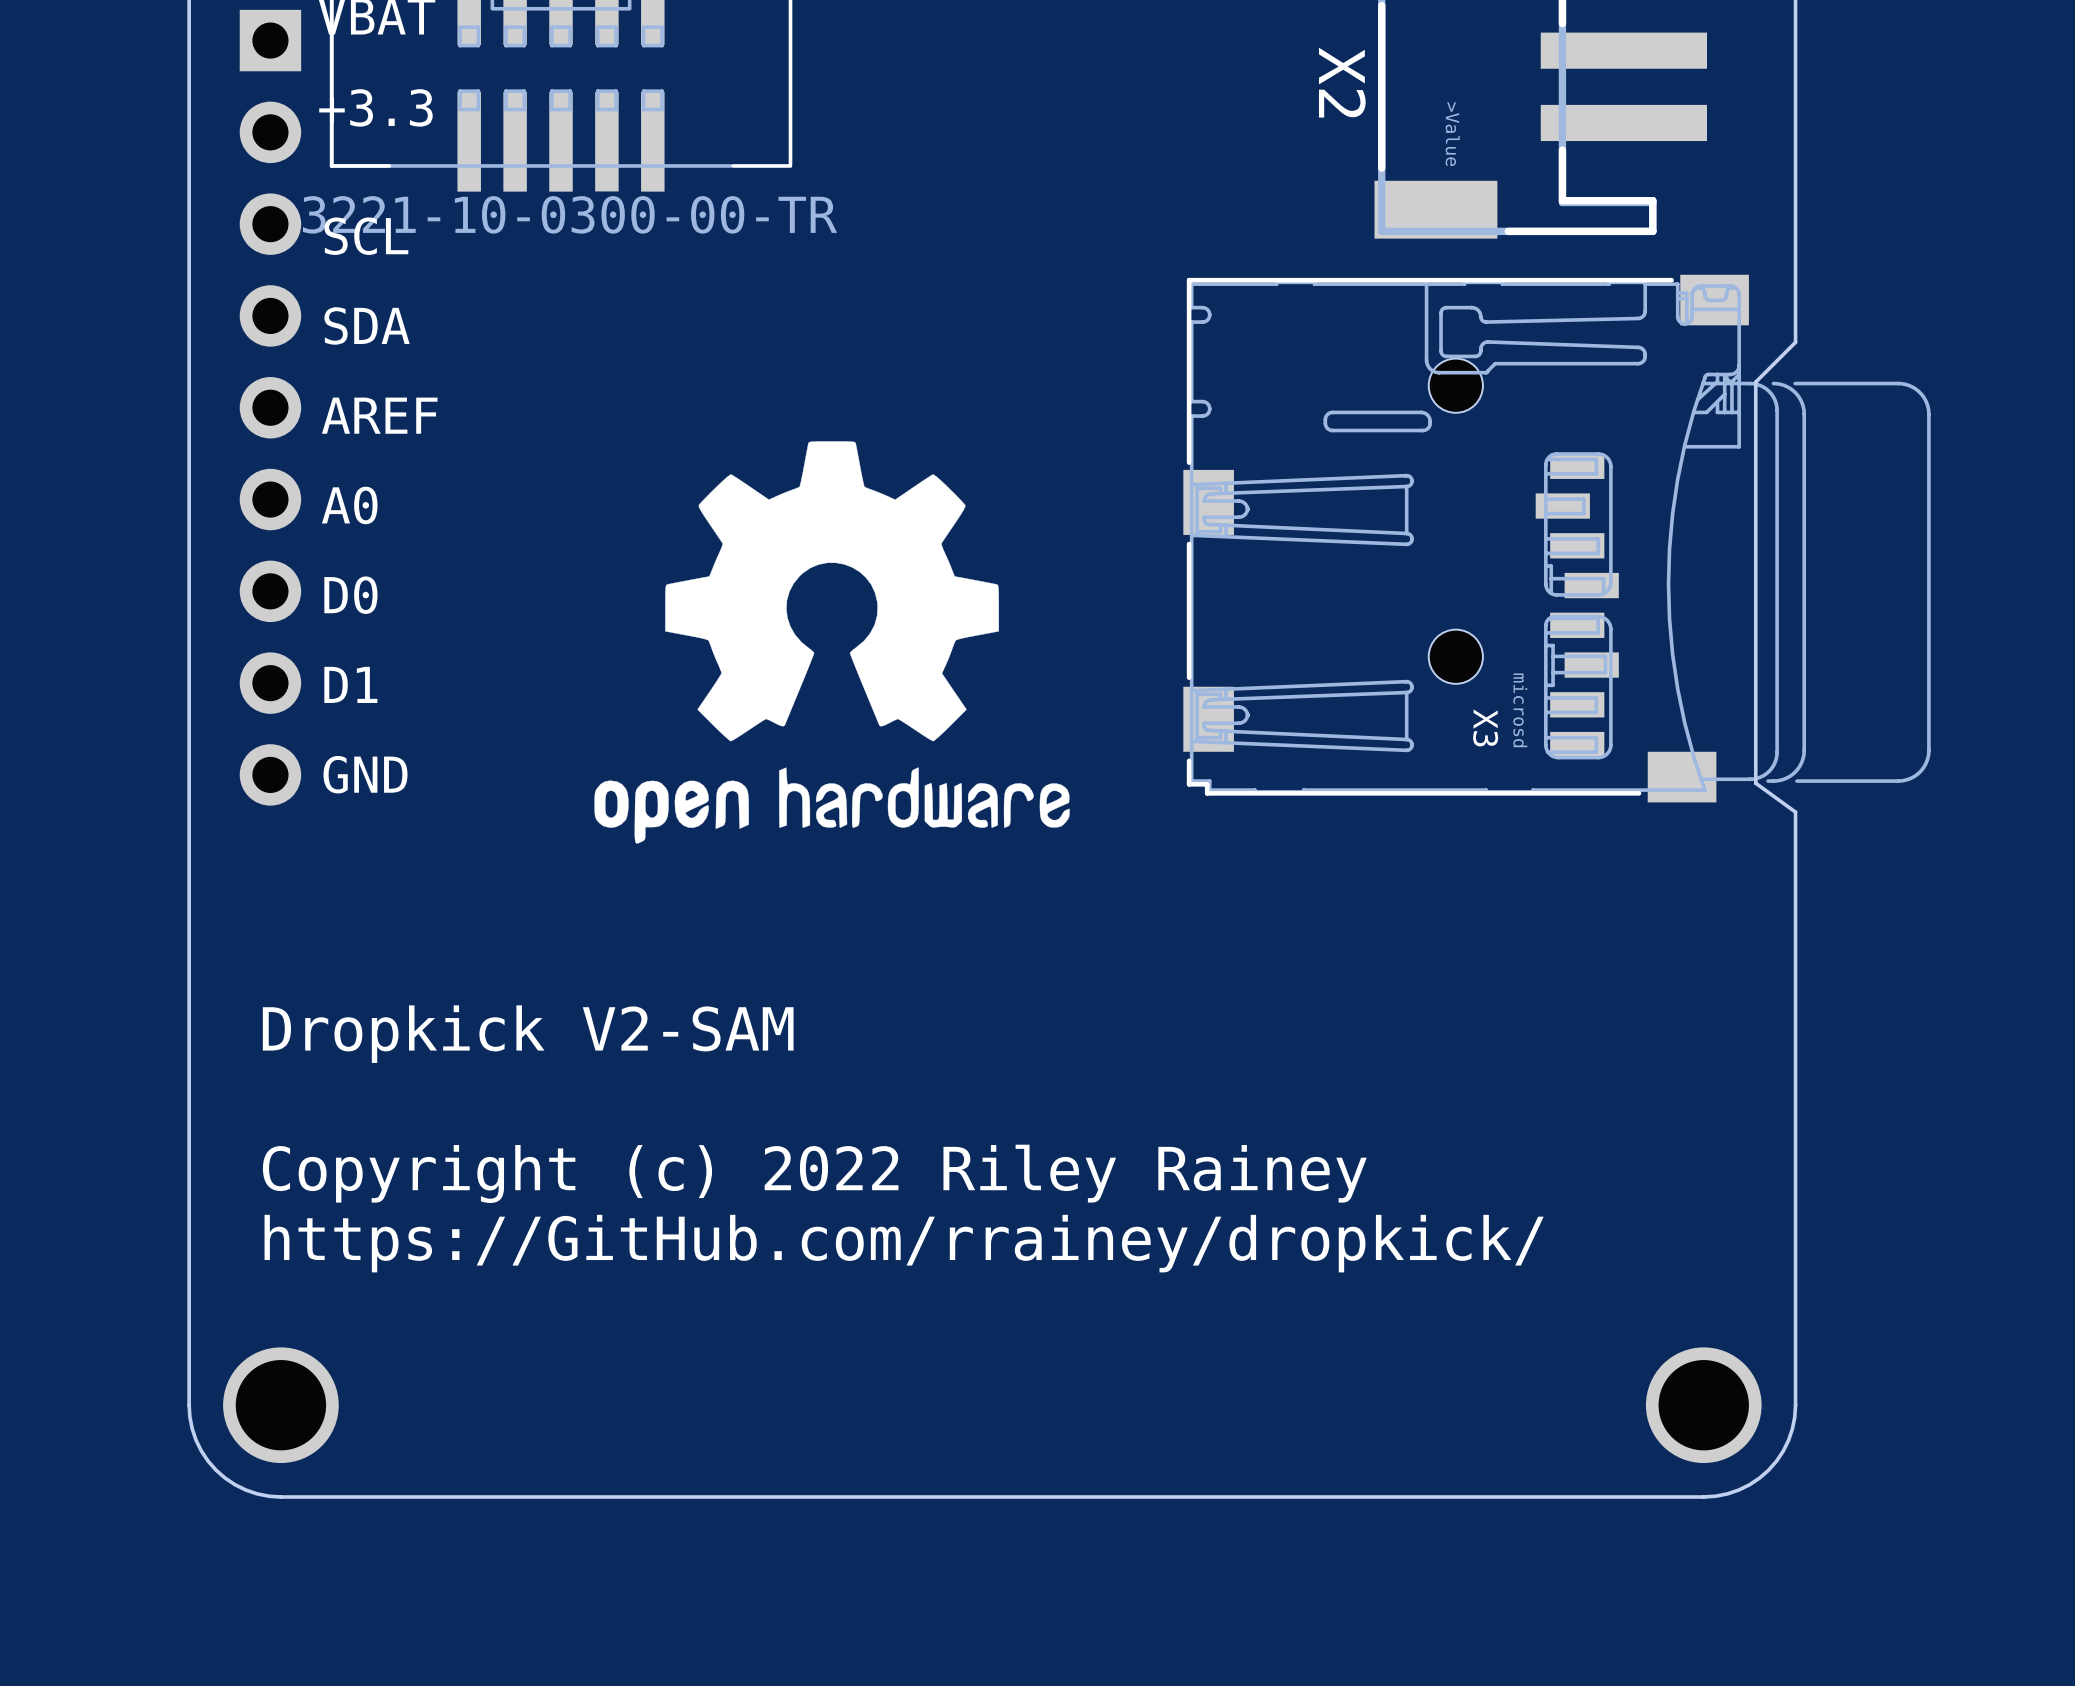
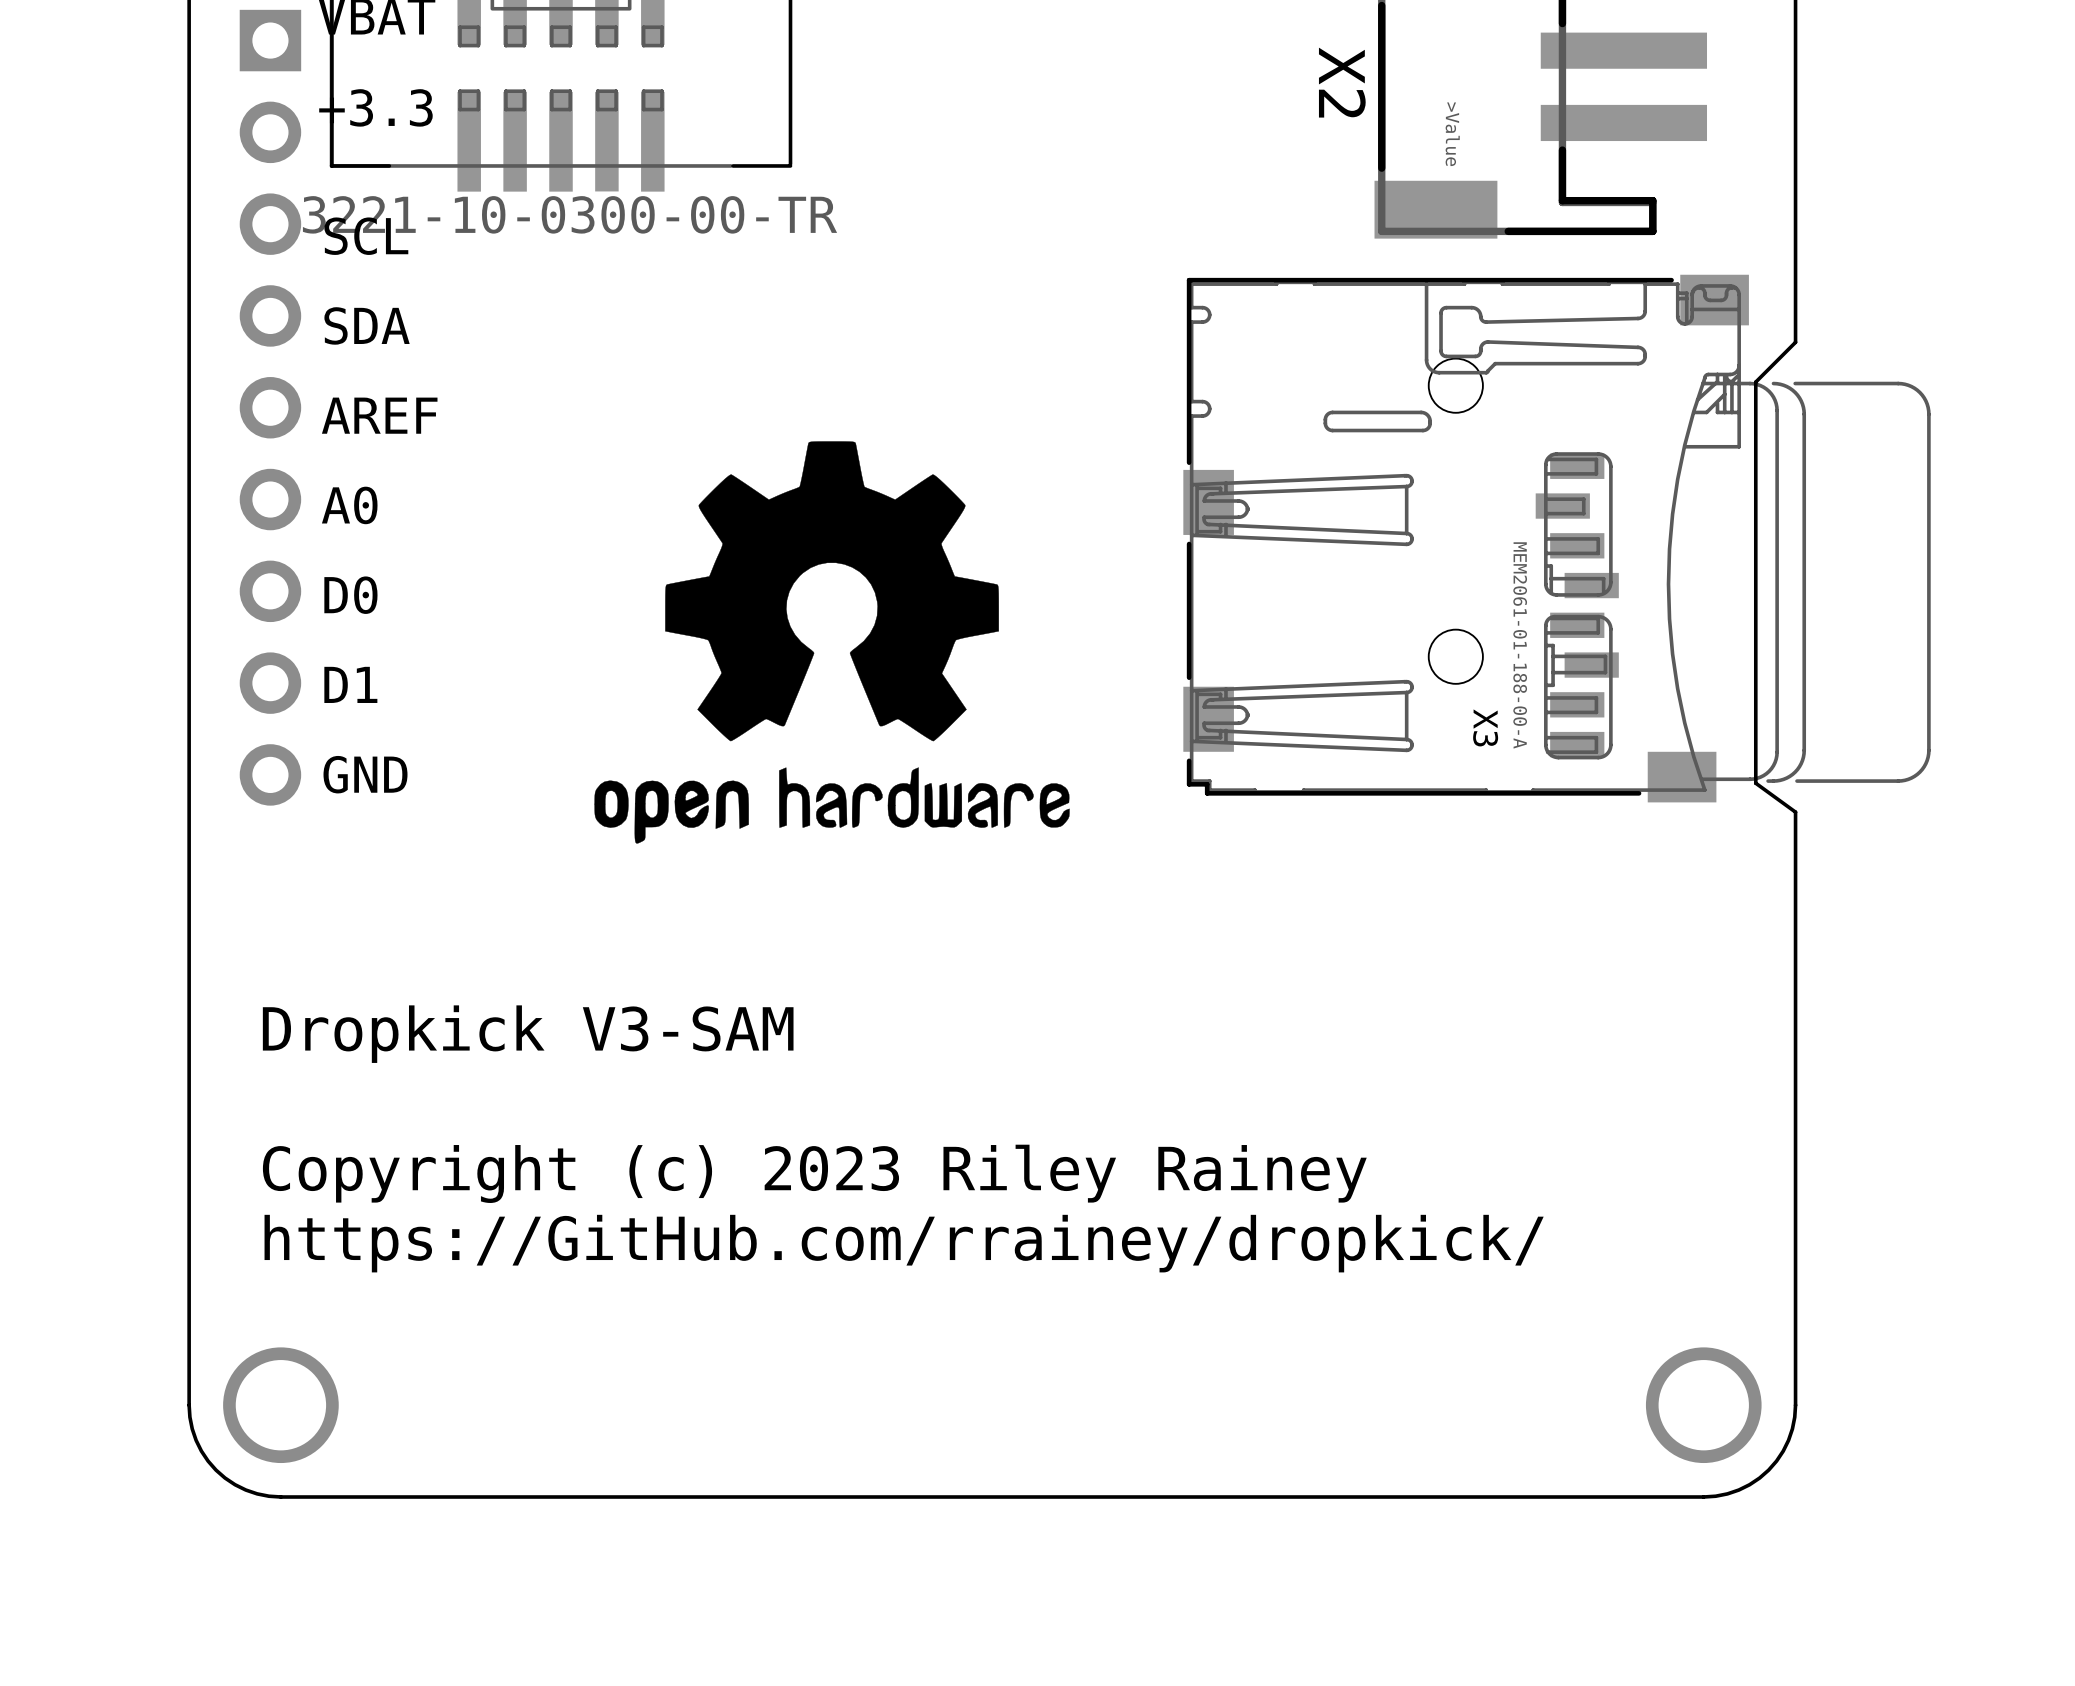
X3 value: microsd (1520, 710) -> MEM2061-01-188-00-A (1520, 645)
text: Dropkick V2-SAM (528, 1034) -> Dropkick V3-SAM (528, 1034)
text: Copyright (c) 2022 Riley Rainey (814, 1173) -> Copyright (c) 2023 Riley Rainey (814, 1173)

